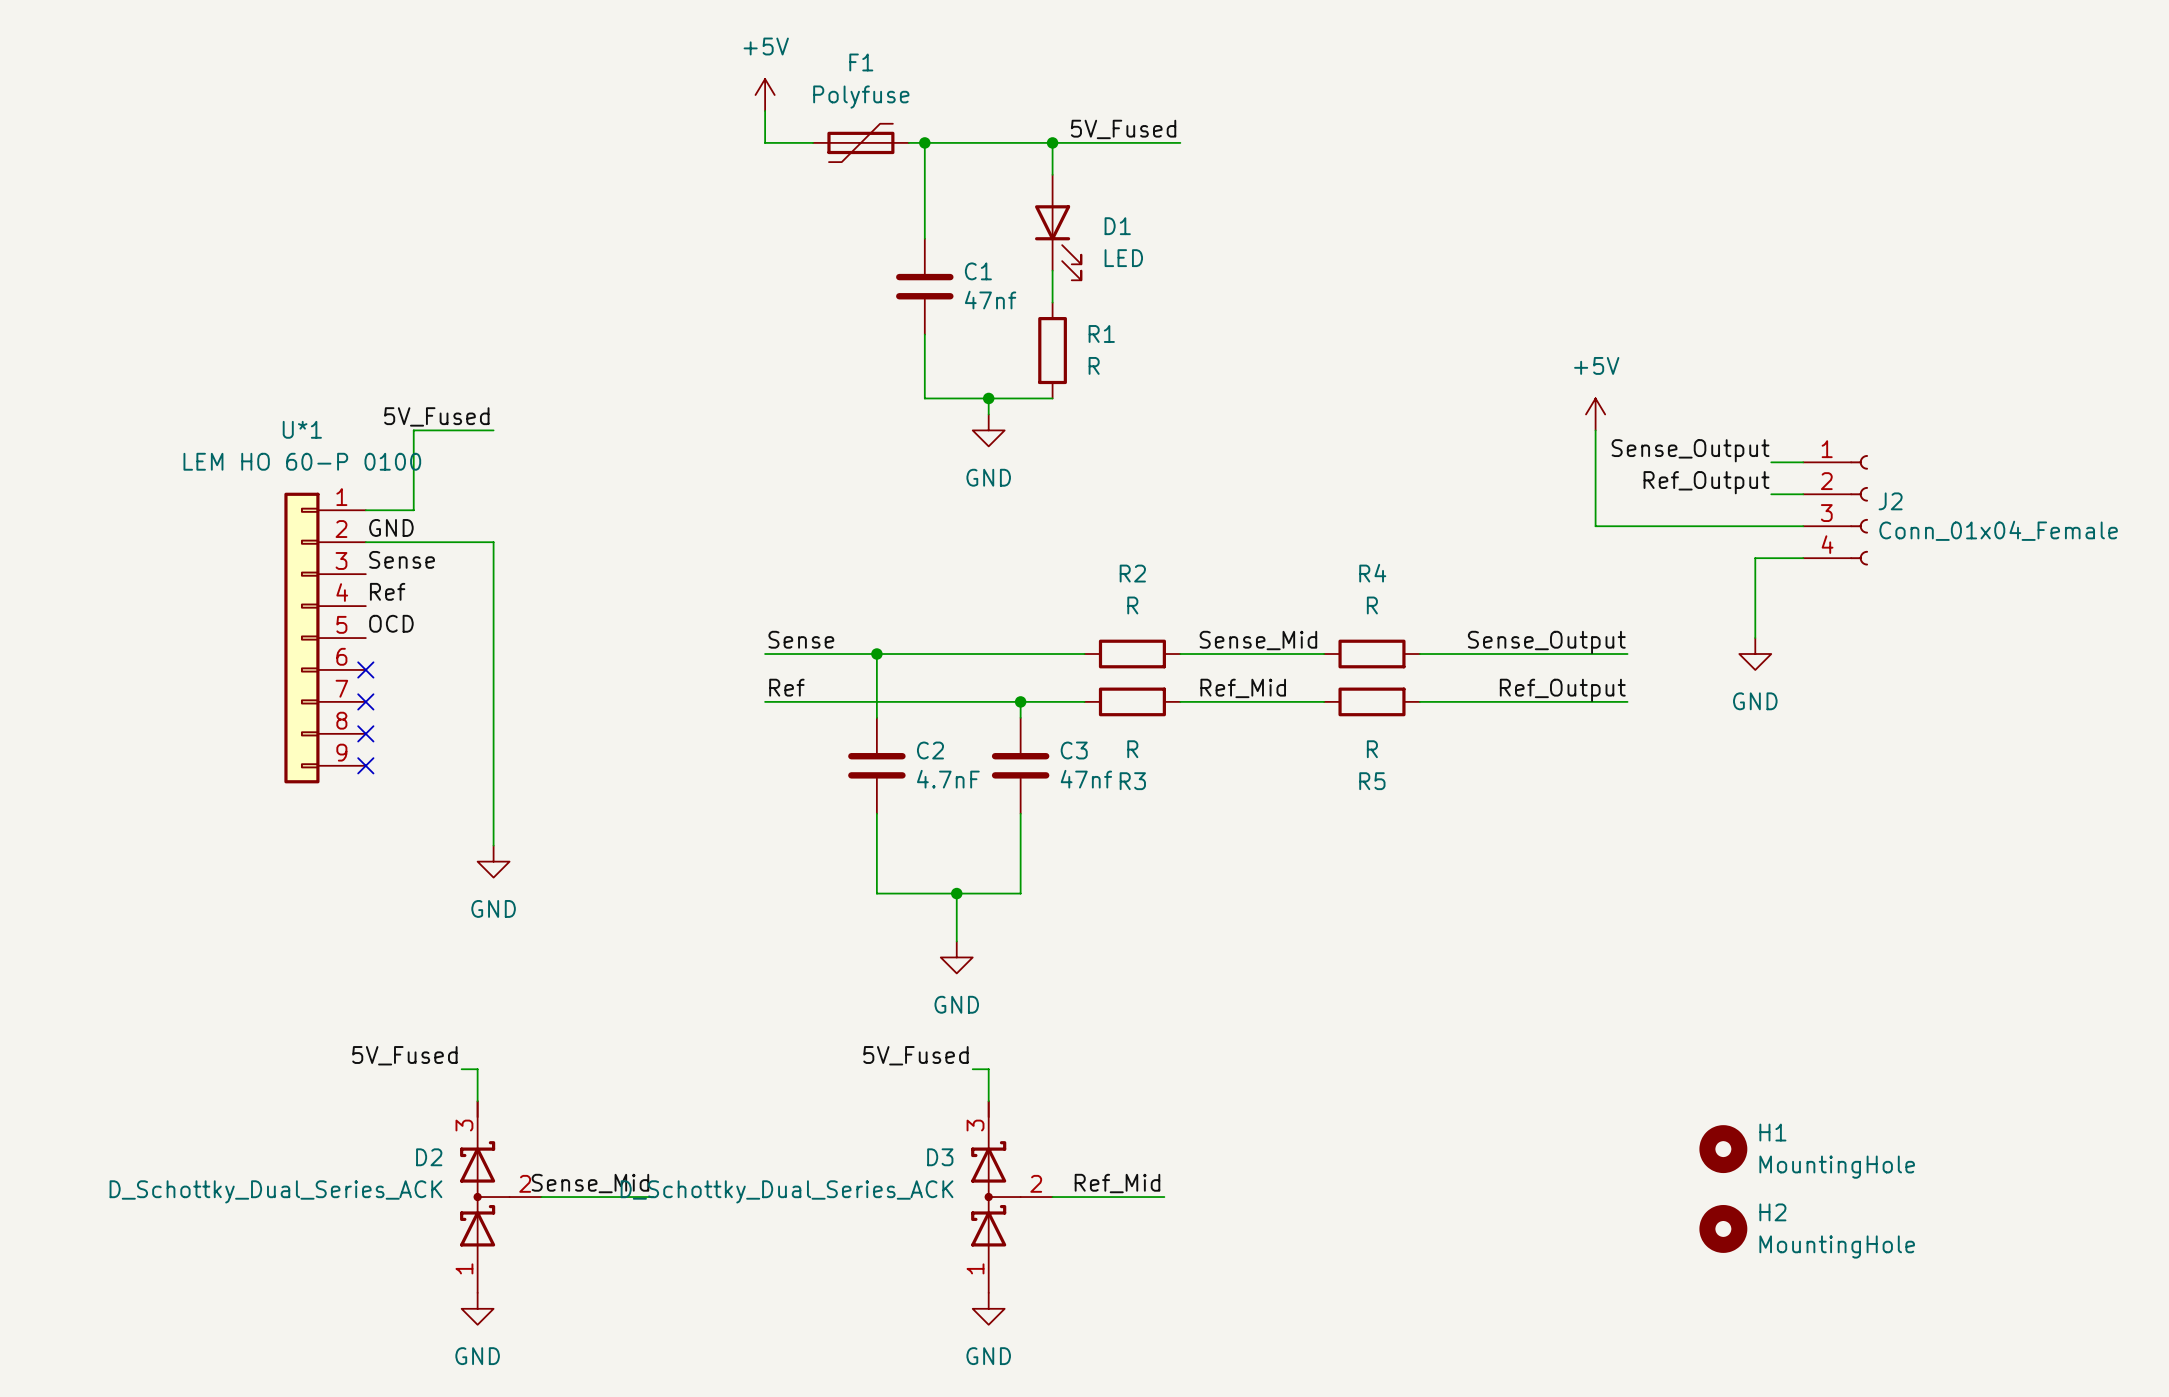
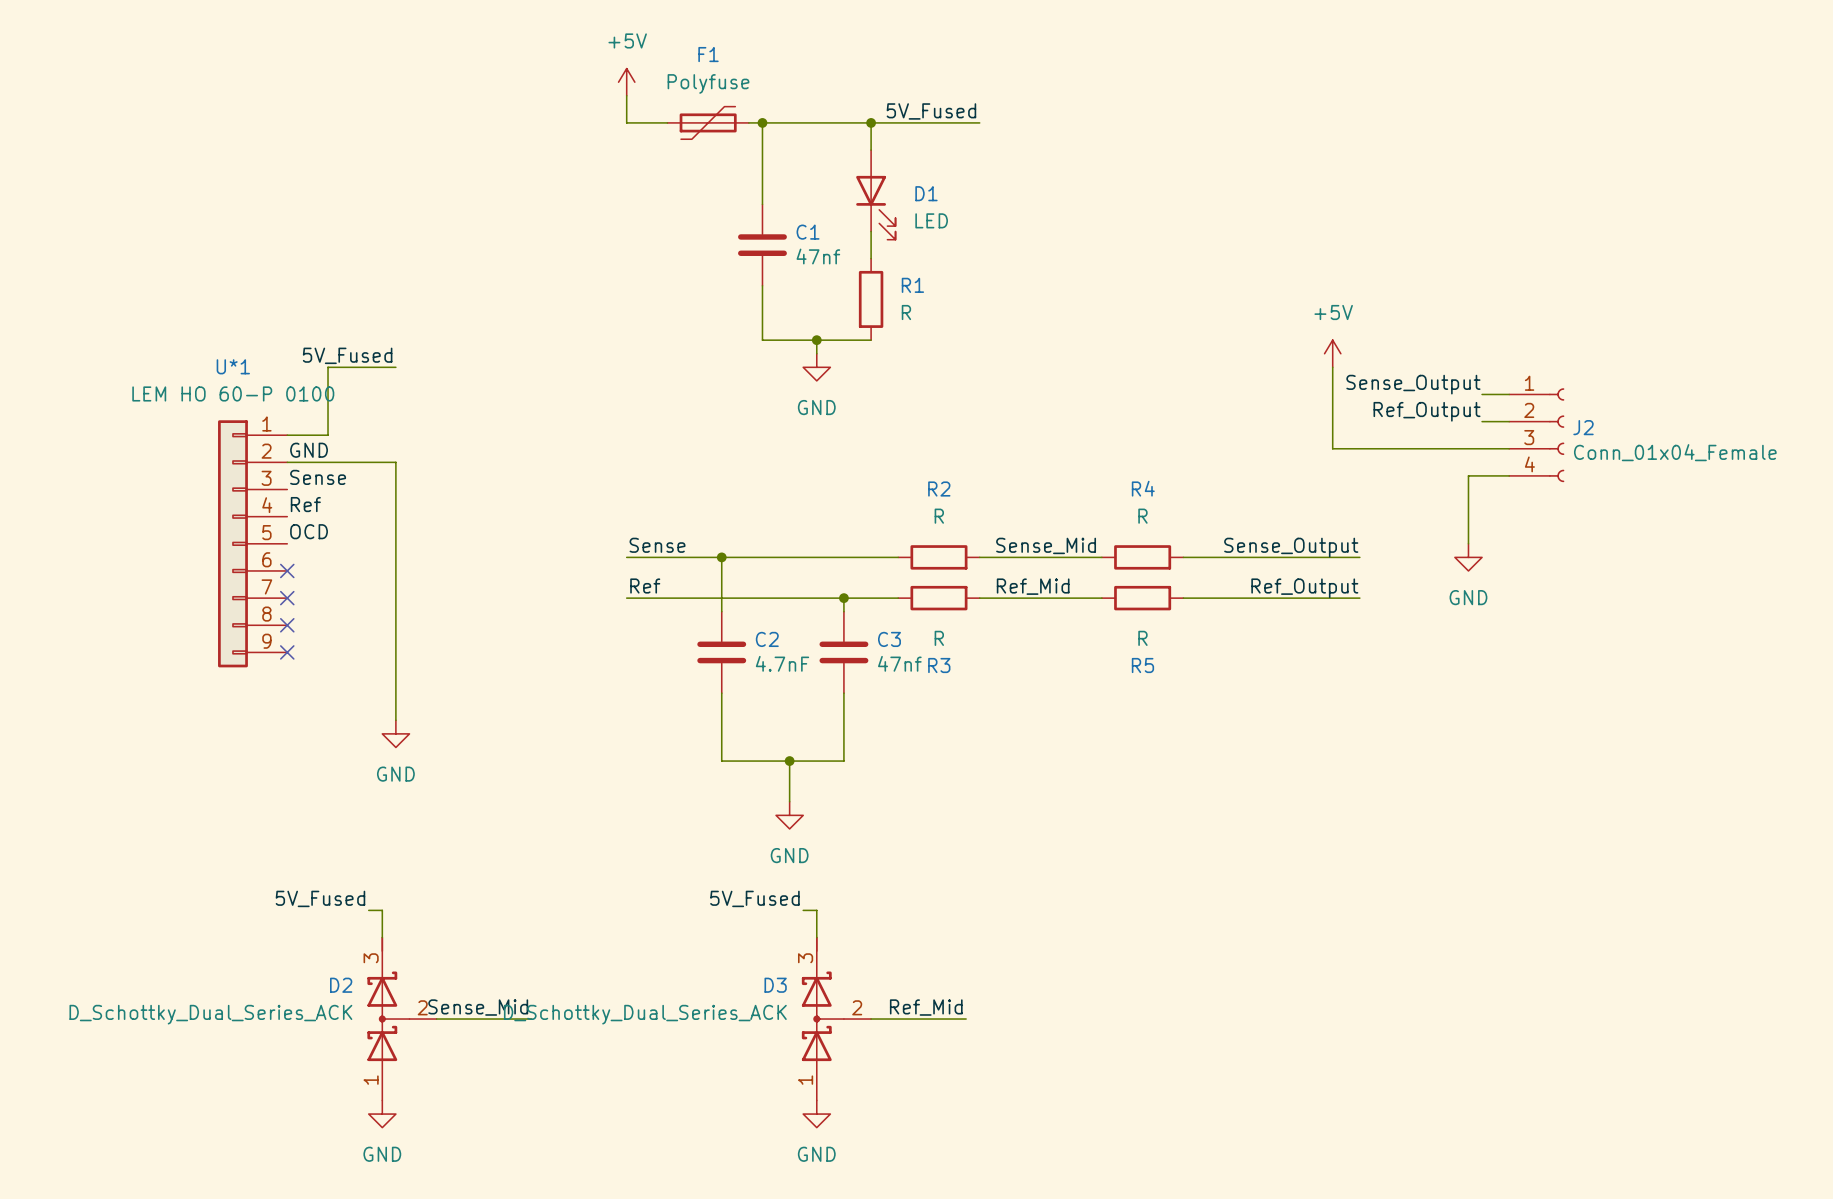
H1: MountingHole (1723, 1149) -> none
H2: MountingHole (1723, 1228) -> none

